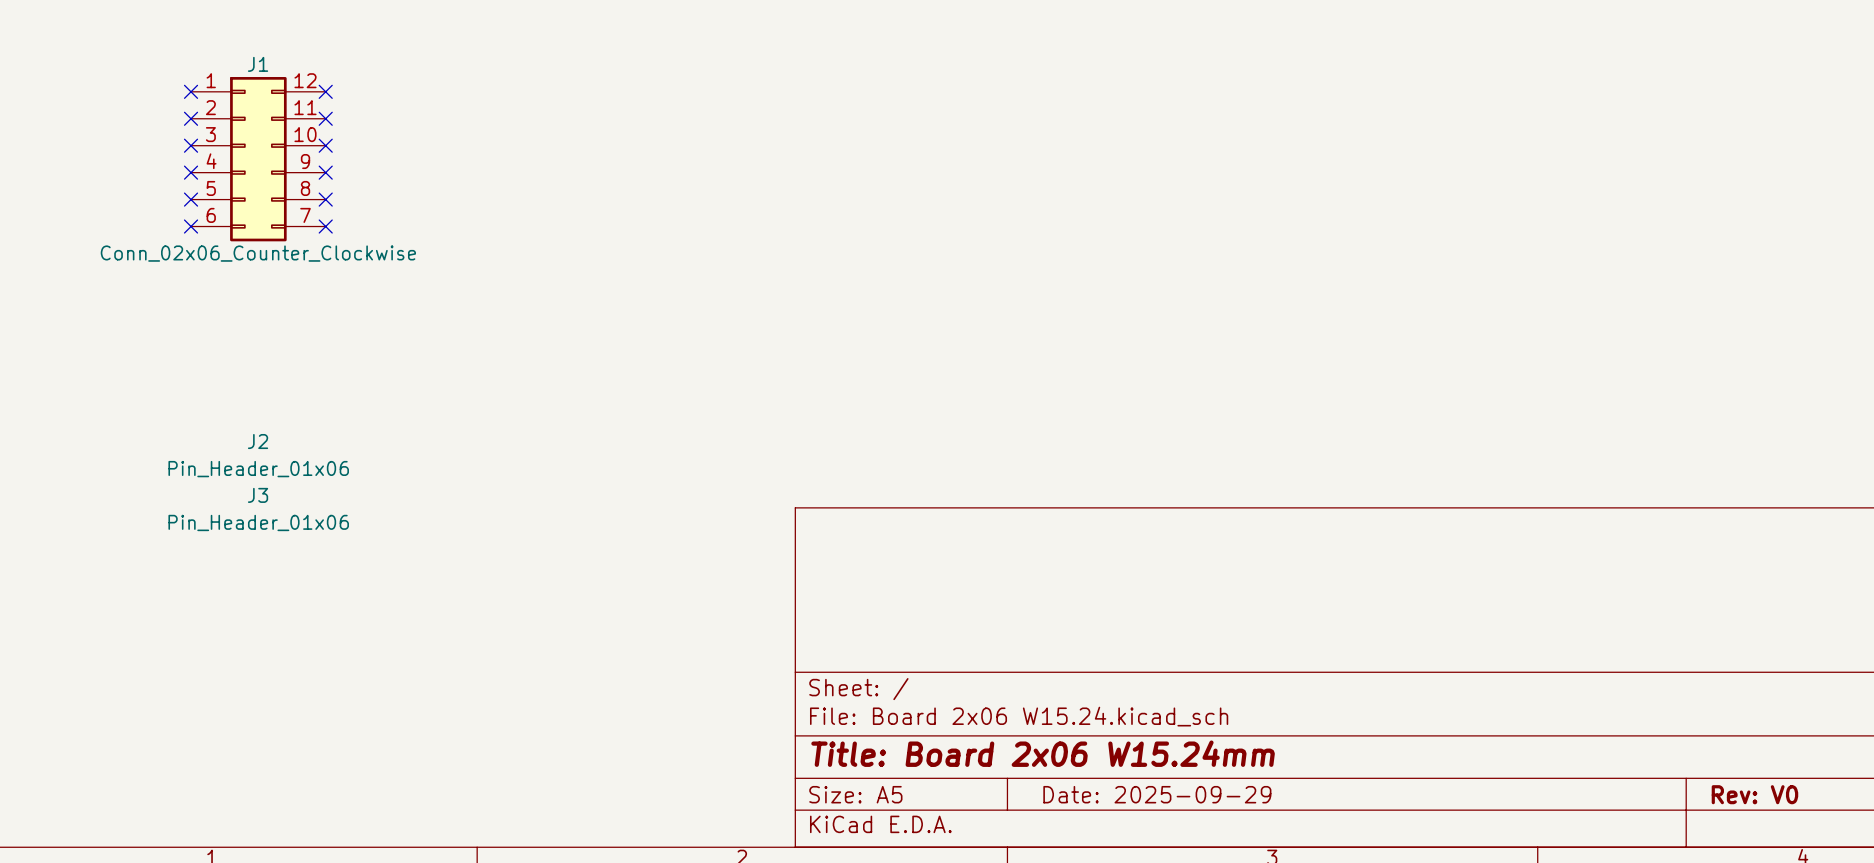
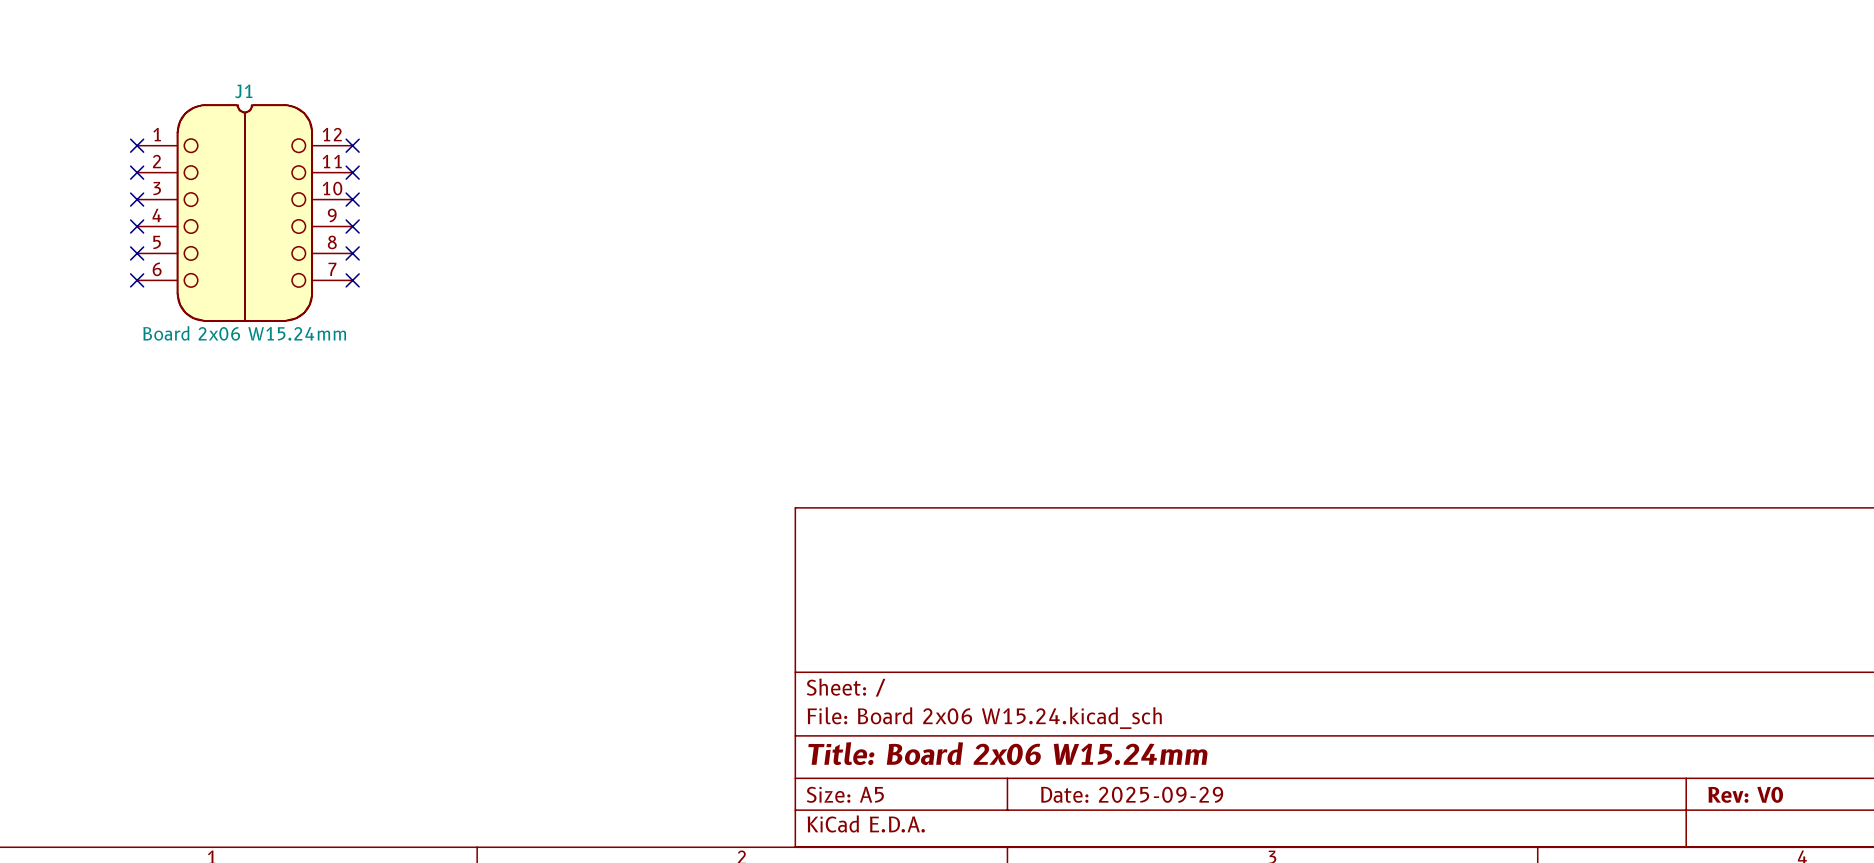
J1 name position: J1 (258, 64) -> J1 (243, 91)
J1 symbol: [191, 77, 326, 242] -> [137, 105, 353, 321]
no-connect mark: (191, 91) -> none
no-connect mark: (325, 91) -> none
no-connect mark: (191, 118) -> none
no-connect mark: (325, 118) -> none
no-connect mark: none -> (137, 145)
no-connect mark: (191, 145) -> none
no-connect mark: (325, 145) -> none
no-connect mark: none -> (352, 145)
no-connect mark: none -> (137, 172)
no-connect mark: (191, 172) -> none
no-connect mark: (325, 172) -> none
no-connect mark: none -> (352, 172)
no-connect mark: none -> (137, 199)
no-connect mark: (191, 199) -> none
no-connect mark: (325, 199) -> none
no-connect mark: none -> (352, 199)
no-connect mark: none -> (137, 226)
no-connect mark: (191, 226) -> none
no-connect mark: (325, 226) -> none
no-connect mark: none -> (352, 226)
no-connect mark: none -> (137, 253)
J1 value: Conn_02x06_Counter_Clockwise (258, 253) -> Board 2x06 W15.24mm (244, 333)
no-connect mark: none -> (352, 253)
no-connect mark: none -> (137, 280)
no-connect mark: none -> (352, 280)
J2: Pin_Header_01x06 (258, 455) -> none
J3: Pin_Header_01x06 (258, 509) -> none

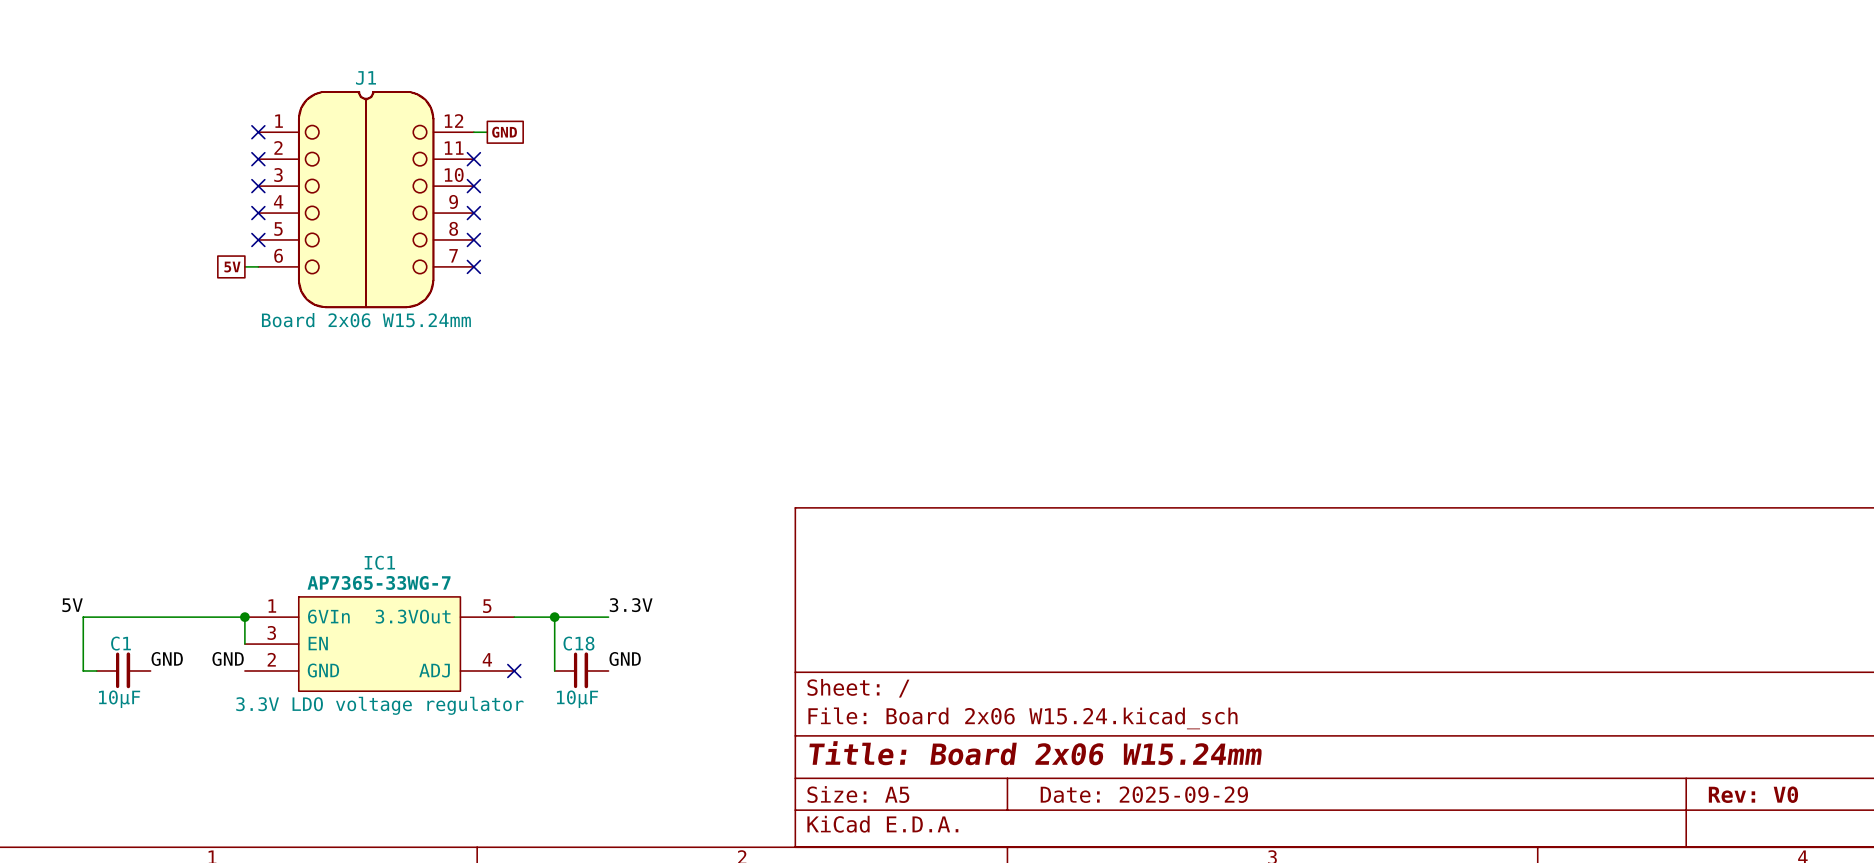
no-connect mark: none -> (258, 132)
wire: none -> (473, 132) (487, 132)
global label: none -> GND (504, 132)
no-connect mark: (137, 145) -> none
no-connect mark: (352, 145) -> none
no-connect mark: none -> (258, 159)
no-connect mark: none -> (473, 159)
no-connect mark: (137, 172) -> none
no-connect mark: (352, 172) -> none
no-connect mark: none -> (258, 186)
no-connect mark: none -> (473, 186)
no-connect mark: (137, 199) -> none
no-connect mark: (352, 199) -> none
J1 position: (244, 213) -> (366, 199)
no-connect mark: none -> (258, 213)
no-connect mark: none -> (473, 213)
no-connect mark: (137, 226) -> none
no-connect mark: (352, 226) -> none
no-connect mark: none -> (258, 239)
no-connect mark: none -> (473, 239)
no-connect mark: (137, 253) -> none
no-connect mark: (352, 253) -> none
no-connect mark: none -> (473, 266)
global label: none -> 5V (232, 267)
no-connect mark: (137, 280) -> none
no-connect mark: (352, 280) -> none
label: none -> 5V (72, 605)
label: none -> 3.3V (631, 605)
junction: none -> (244, 617)
wire: none -> (514, 617) (608, 617)
wire: none -> (554, 617) (554, 670)
junction: none -> (554, 617)
wire: none -> (244, 644) (244, 617) (83, 617) (83, 670) (96, 670)
IC1: none -> AP7365-33WG-7 (379, 644)
label: none -> GND (167, 658)
label: none -> GND (228, 658)
label: none -> GND (625, 658)
C1: none -> 10µF (123, 670)
no-connect mark: none -> (514, 670)
C18: none -> 10µF (581, 670)

